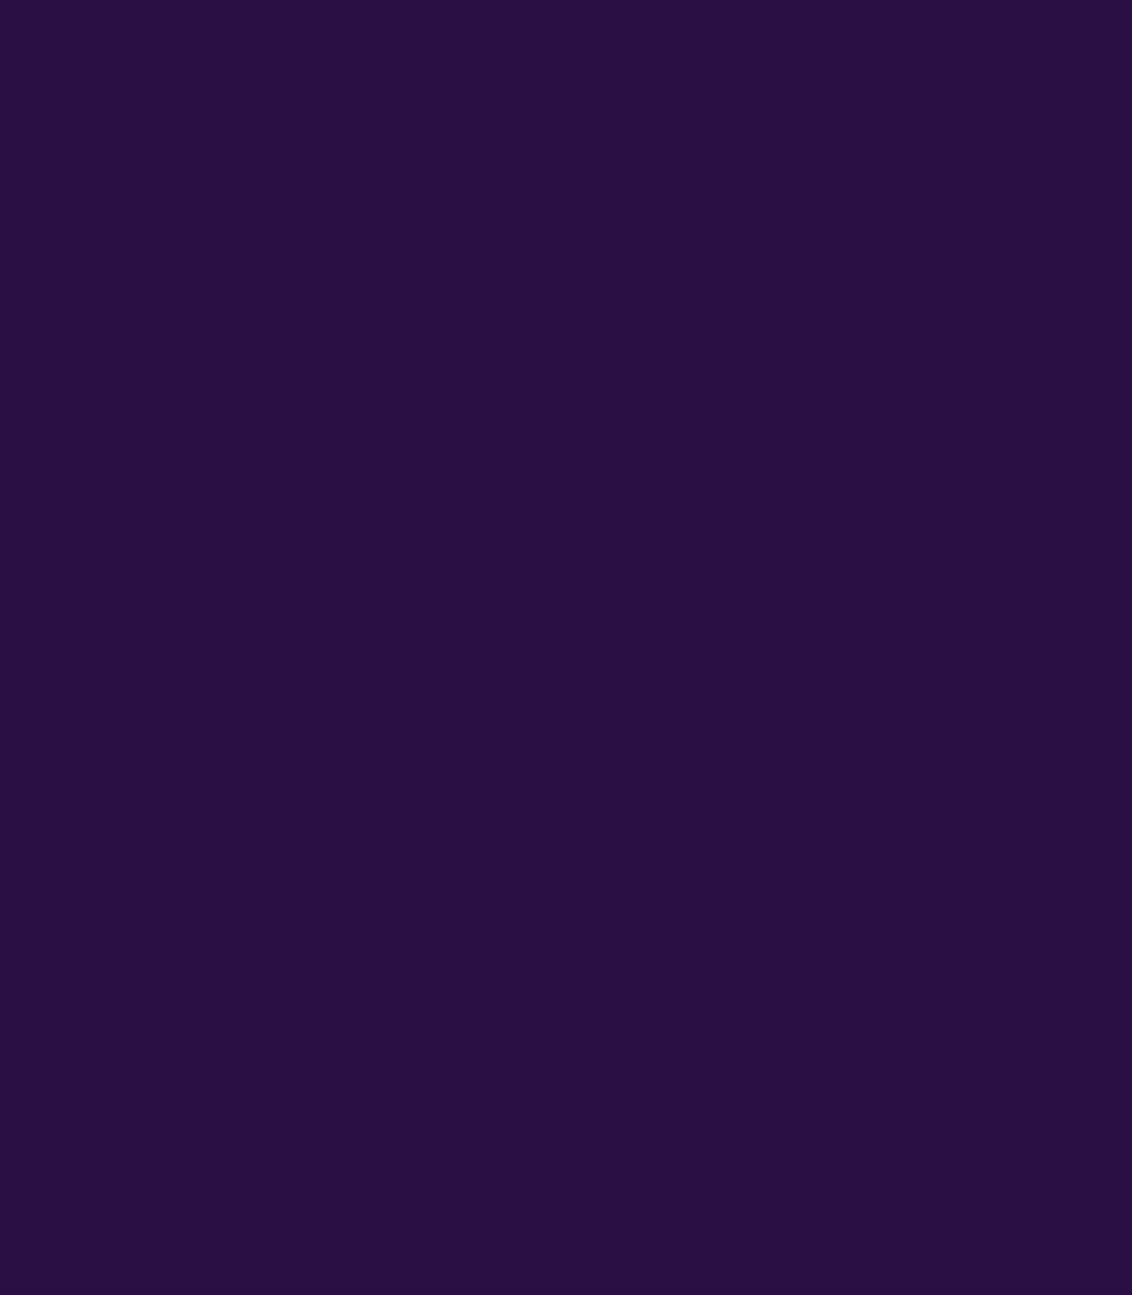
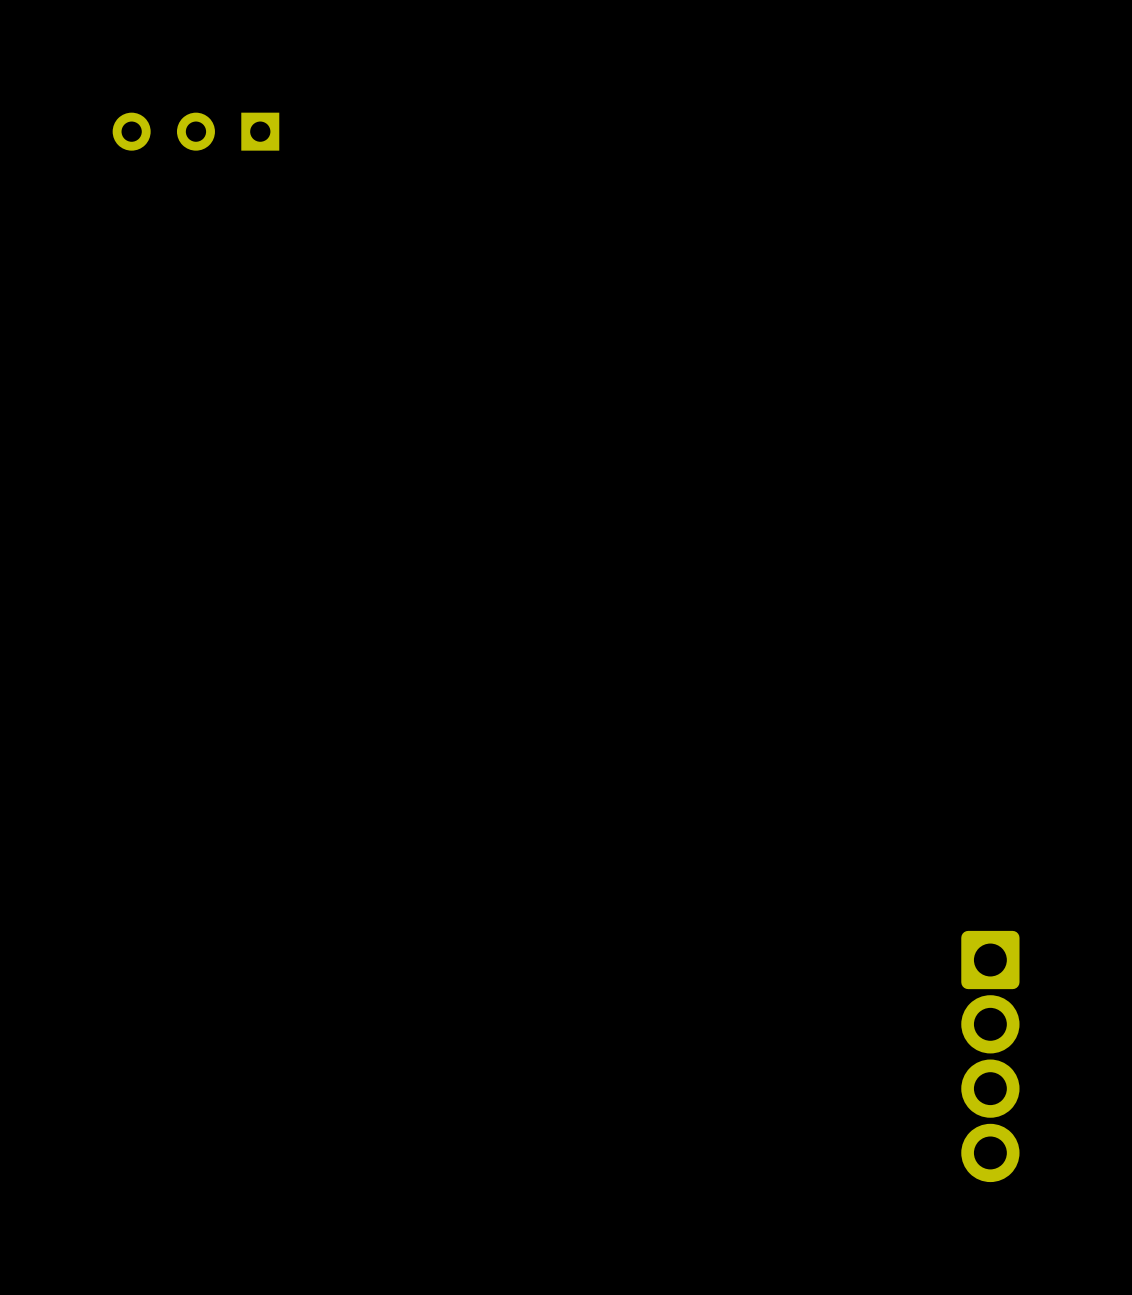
part: none -> (195, 131)
part: none -> (990, 1056)

